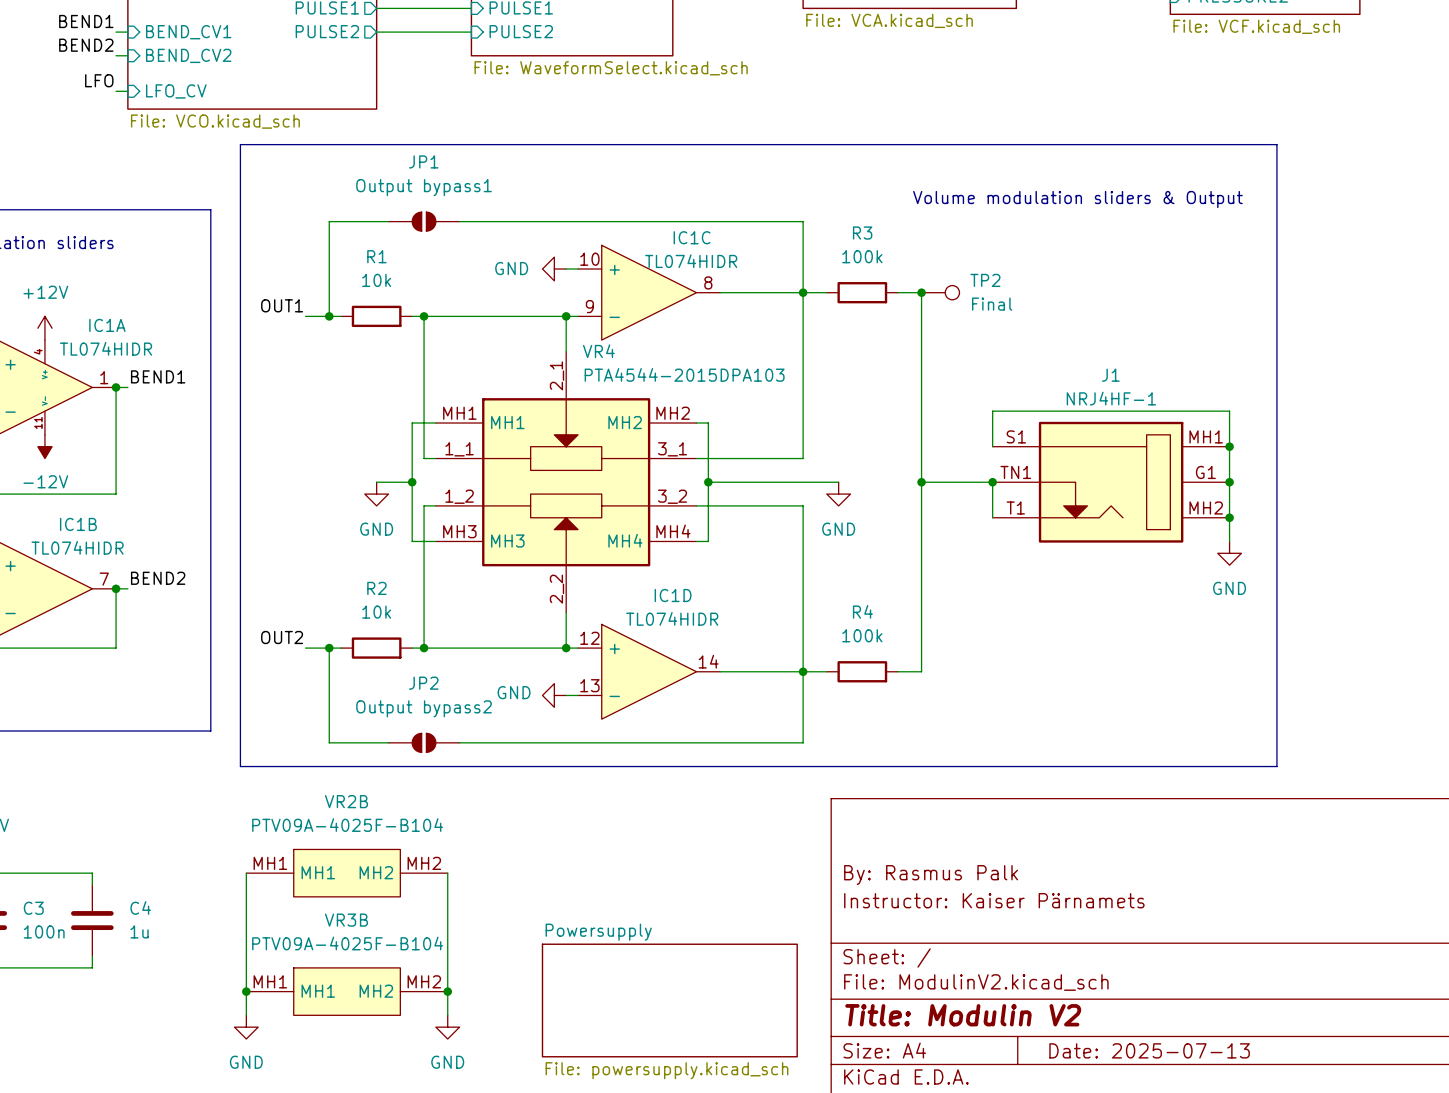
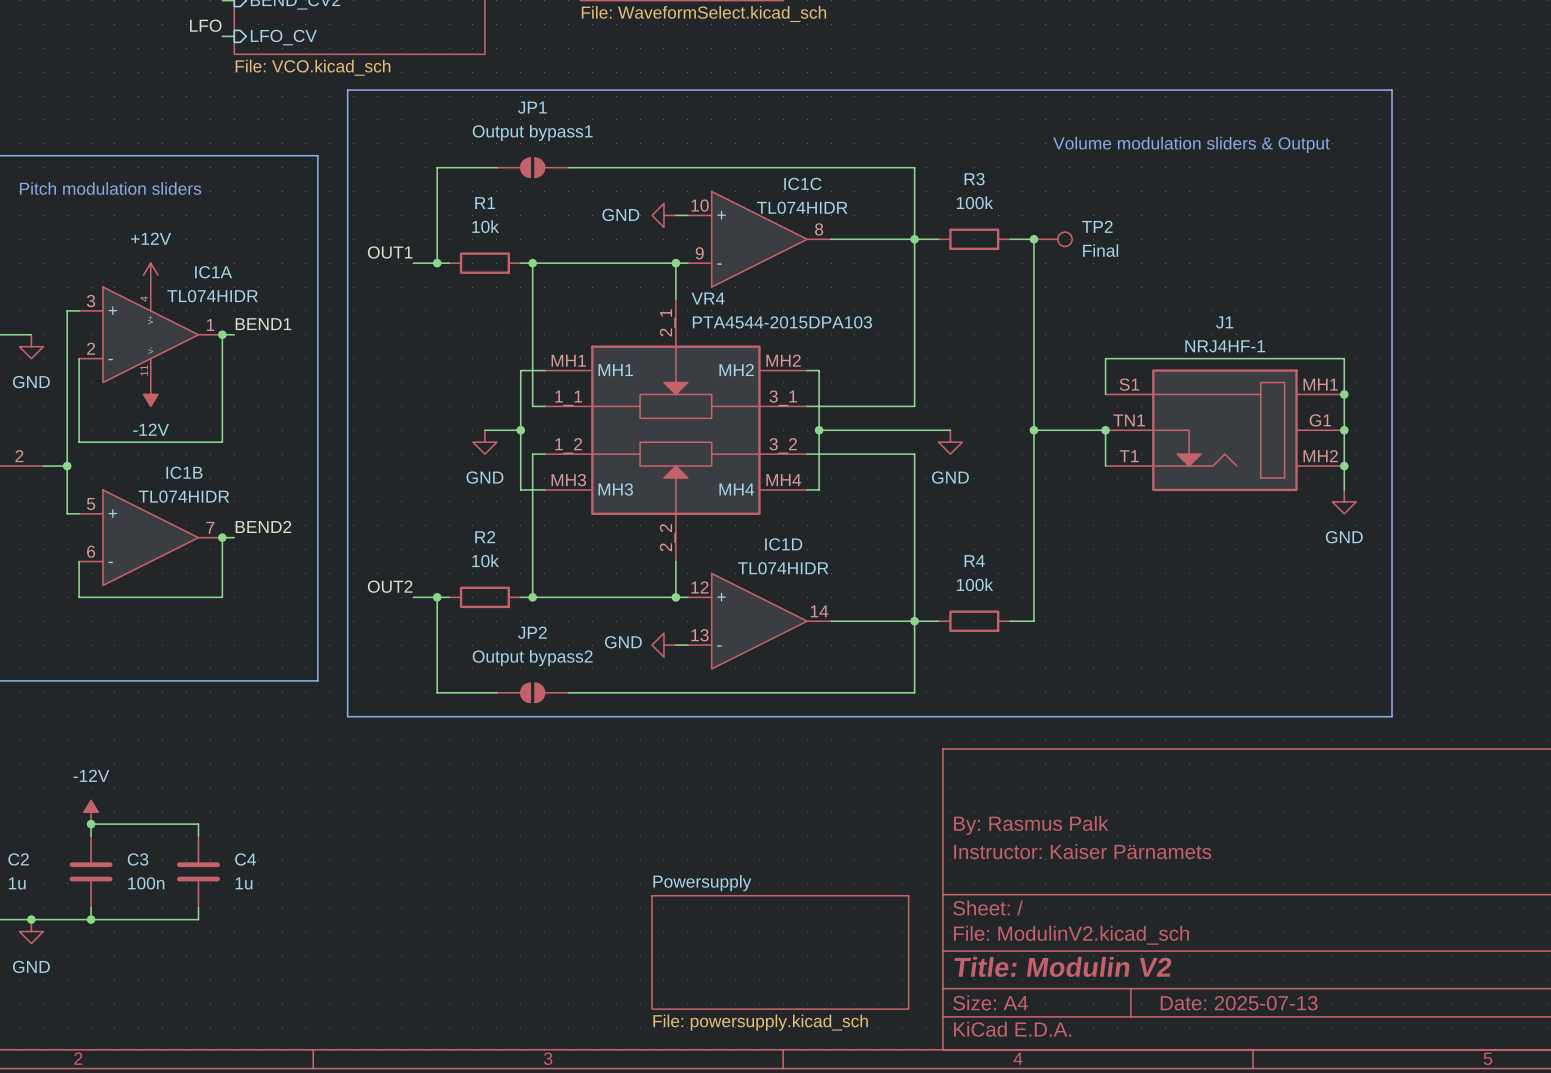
wire: (246, 873) (246, 1015) -> none
VR2B: PTV09A-4025F-B104 (347, 873) -> none
wire: (447, 873) (447, 1015) -> none
junction: (246, 991) -> none
VR3B: PTV09A-4025F-B104 (347, 991) -> none
junction: (447, 991) -> none
power symbol: GND (246, 1027) -> none
power symbol: GND (447, 1027) -> none

